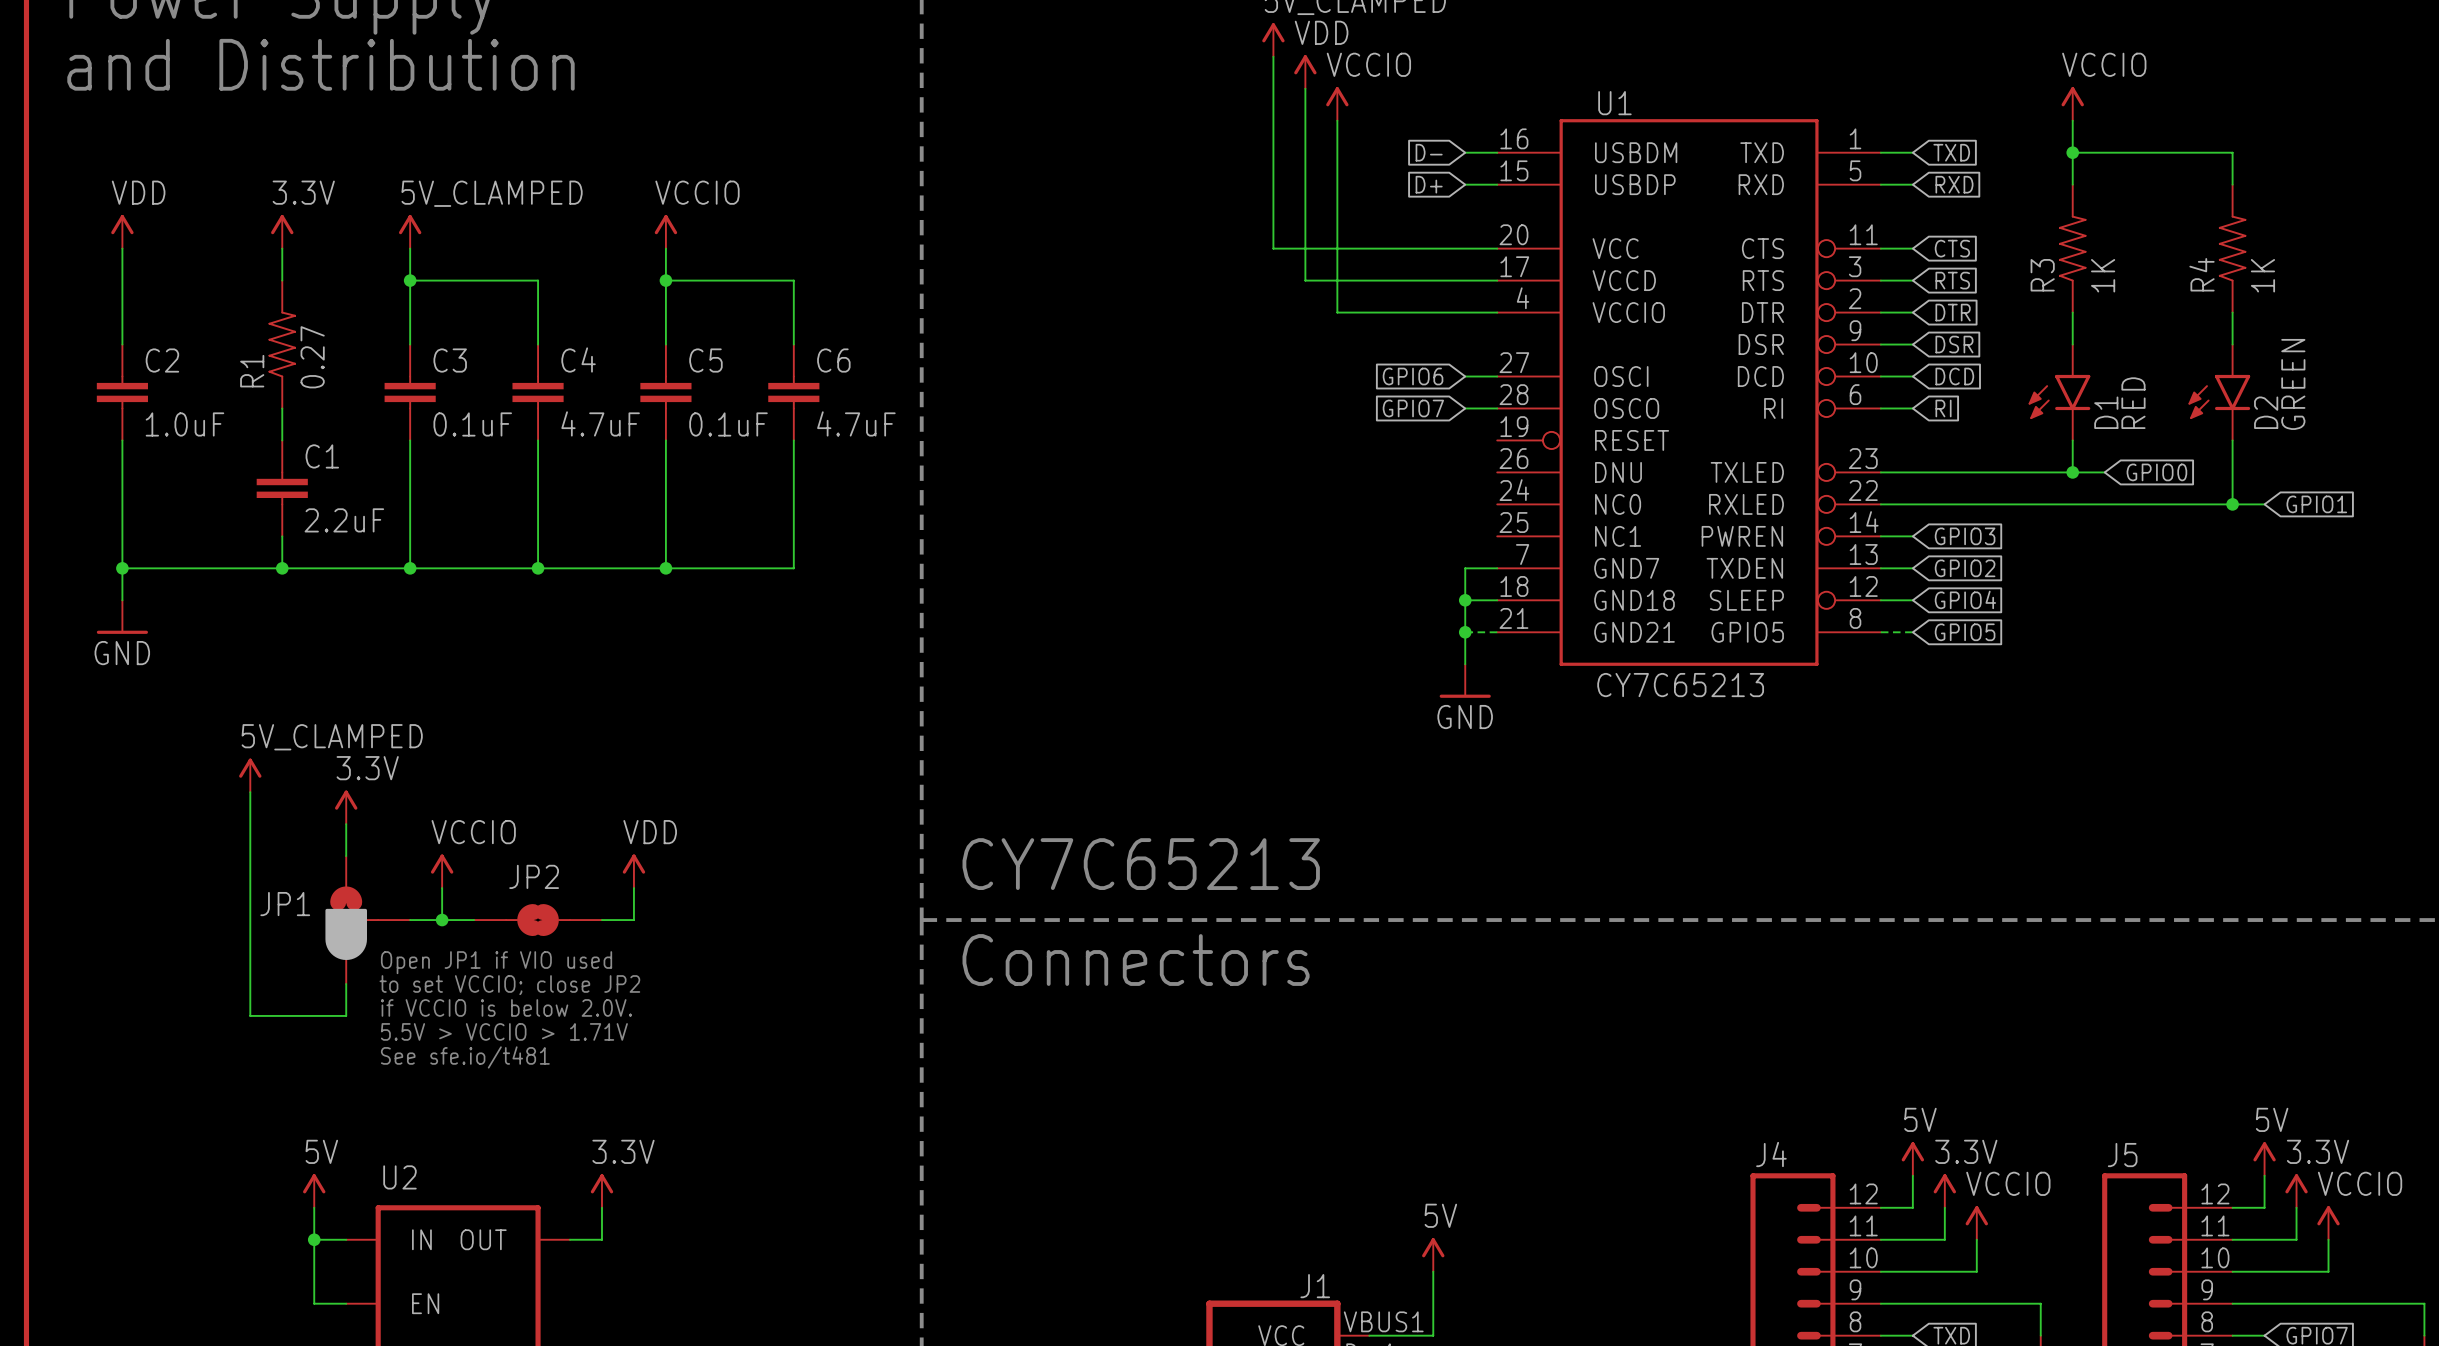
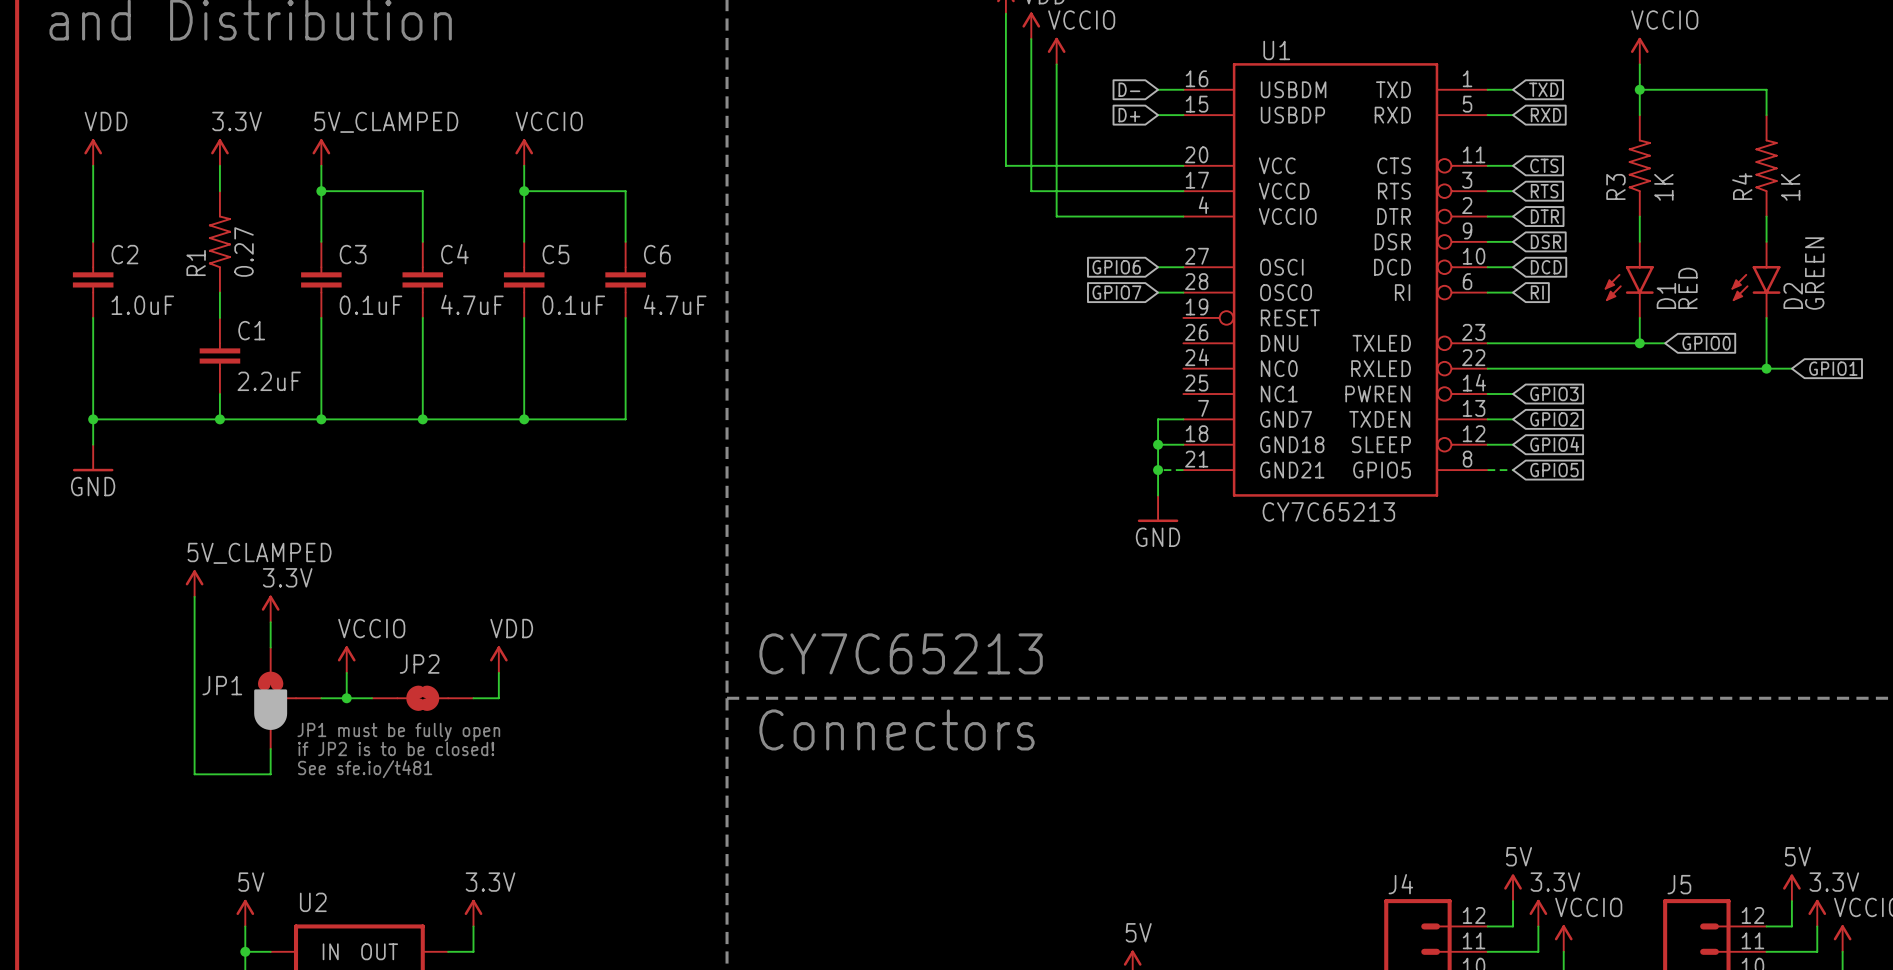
text: Open JP1 if VIO used (496, 962) -> JP1 must be fully open (398, 732)
text: to set VCCIO; close JP2 (509, 985) -> if JP2 is to be closed! (396, 748)
text: if VCCIO is below 2.0V. (506, 1007) -> See sfe.io/t481 (365, 769)
text: 5.5V > VCCIO > 1.71V (504, 1031) -> none
text: See sfe.io/t481 (465, 1057) -> none

